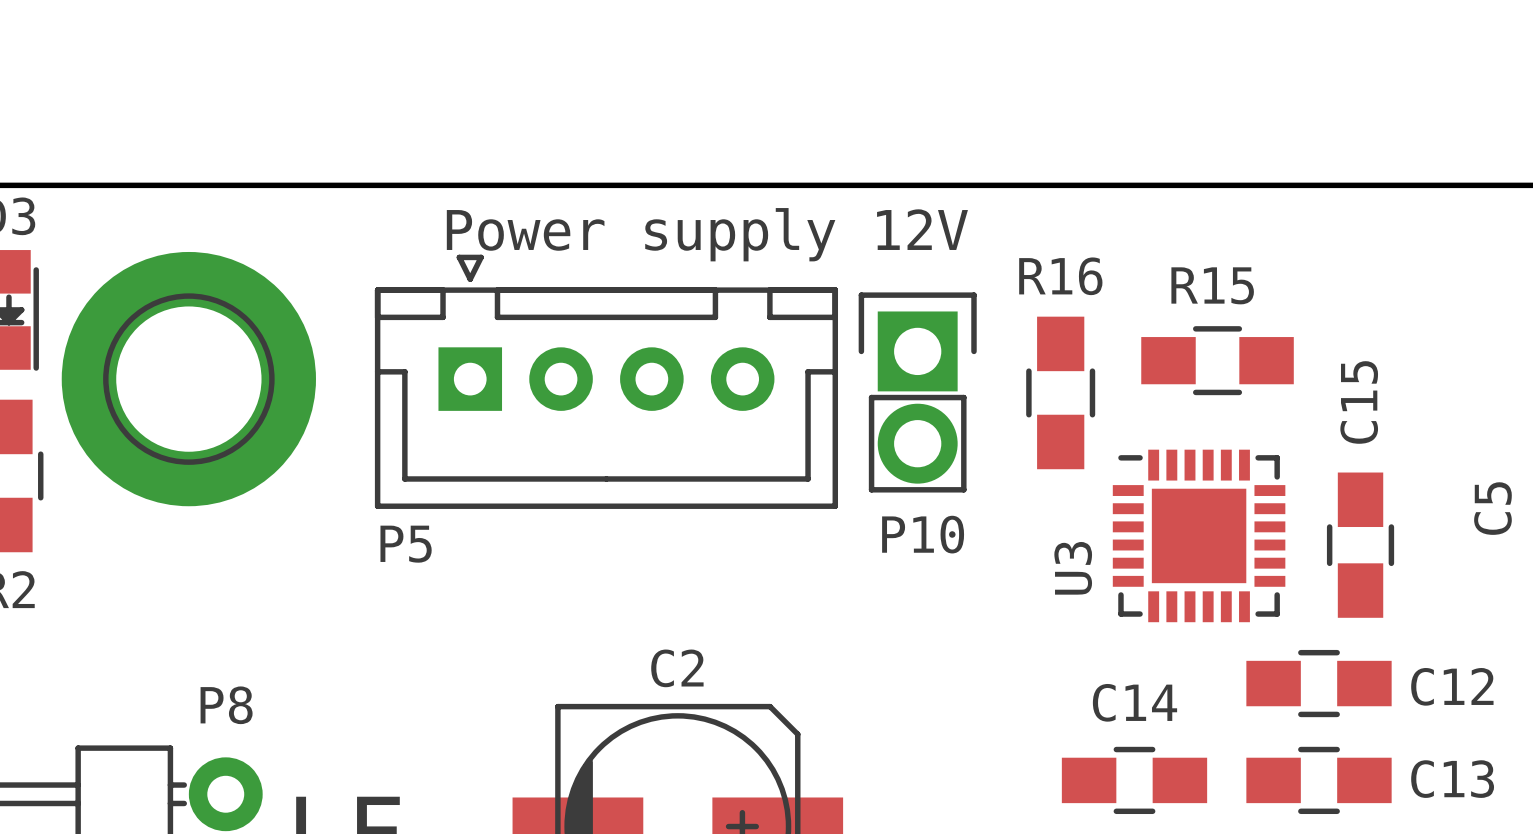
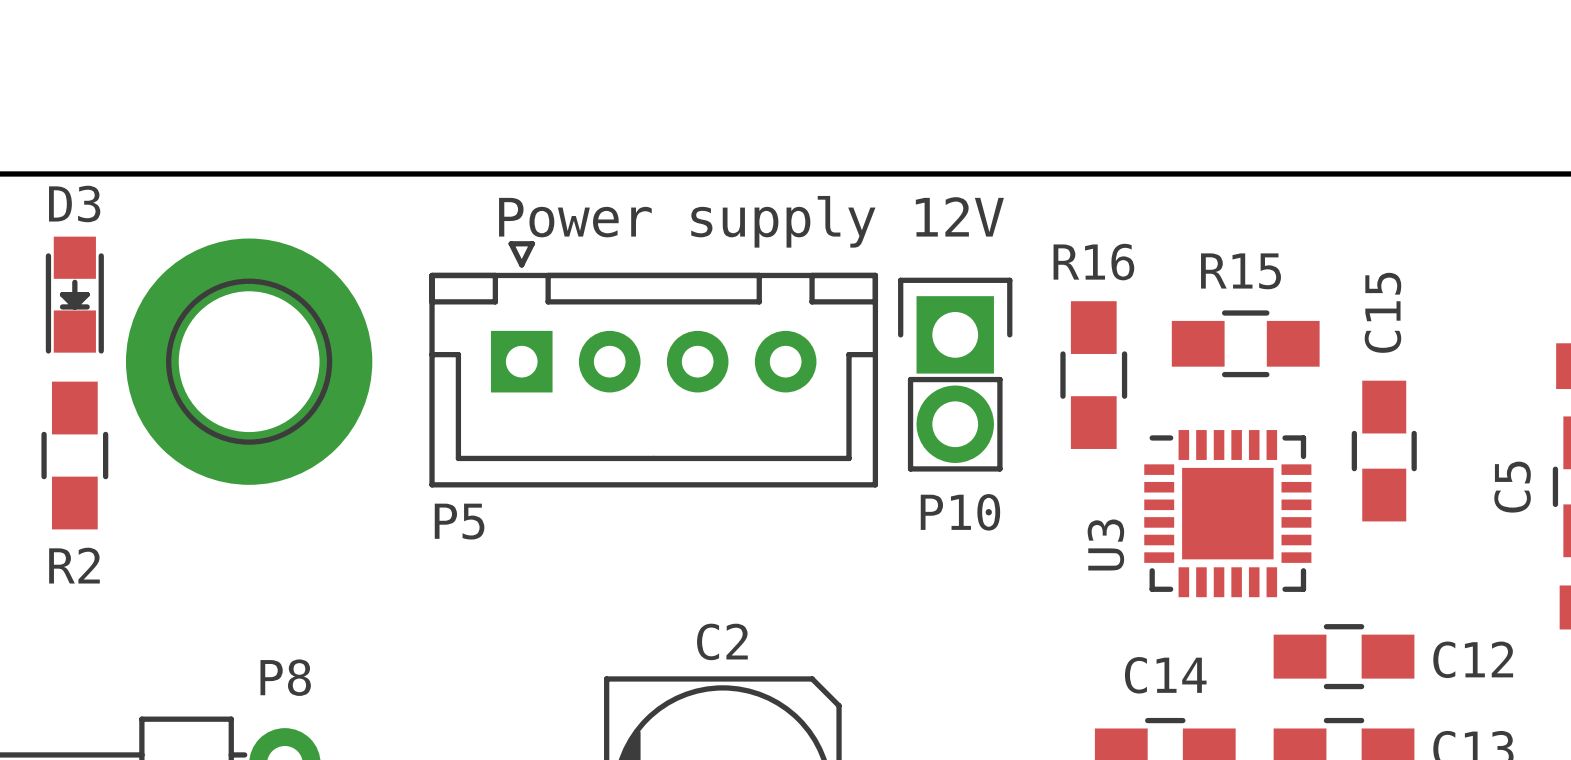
C15 position: (1360, 545) -> (1384, 451)

